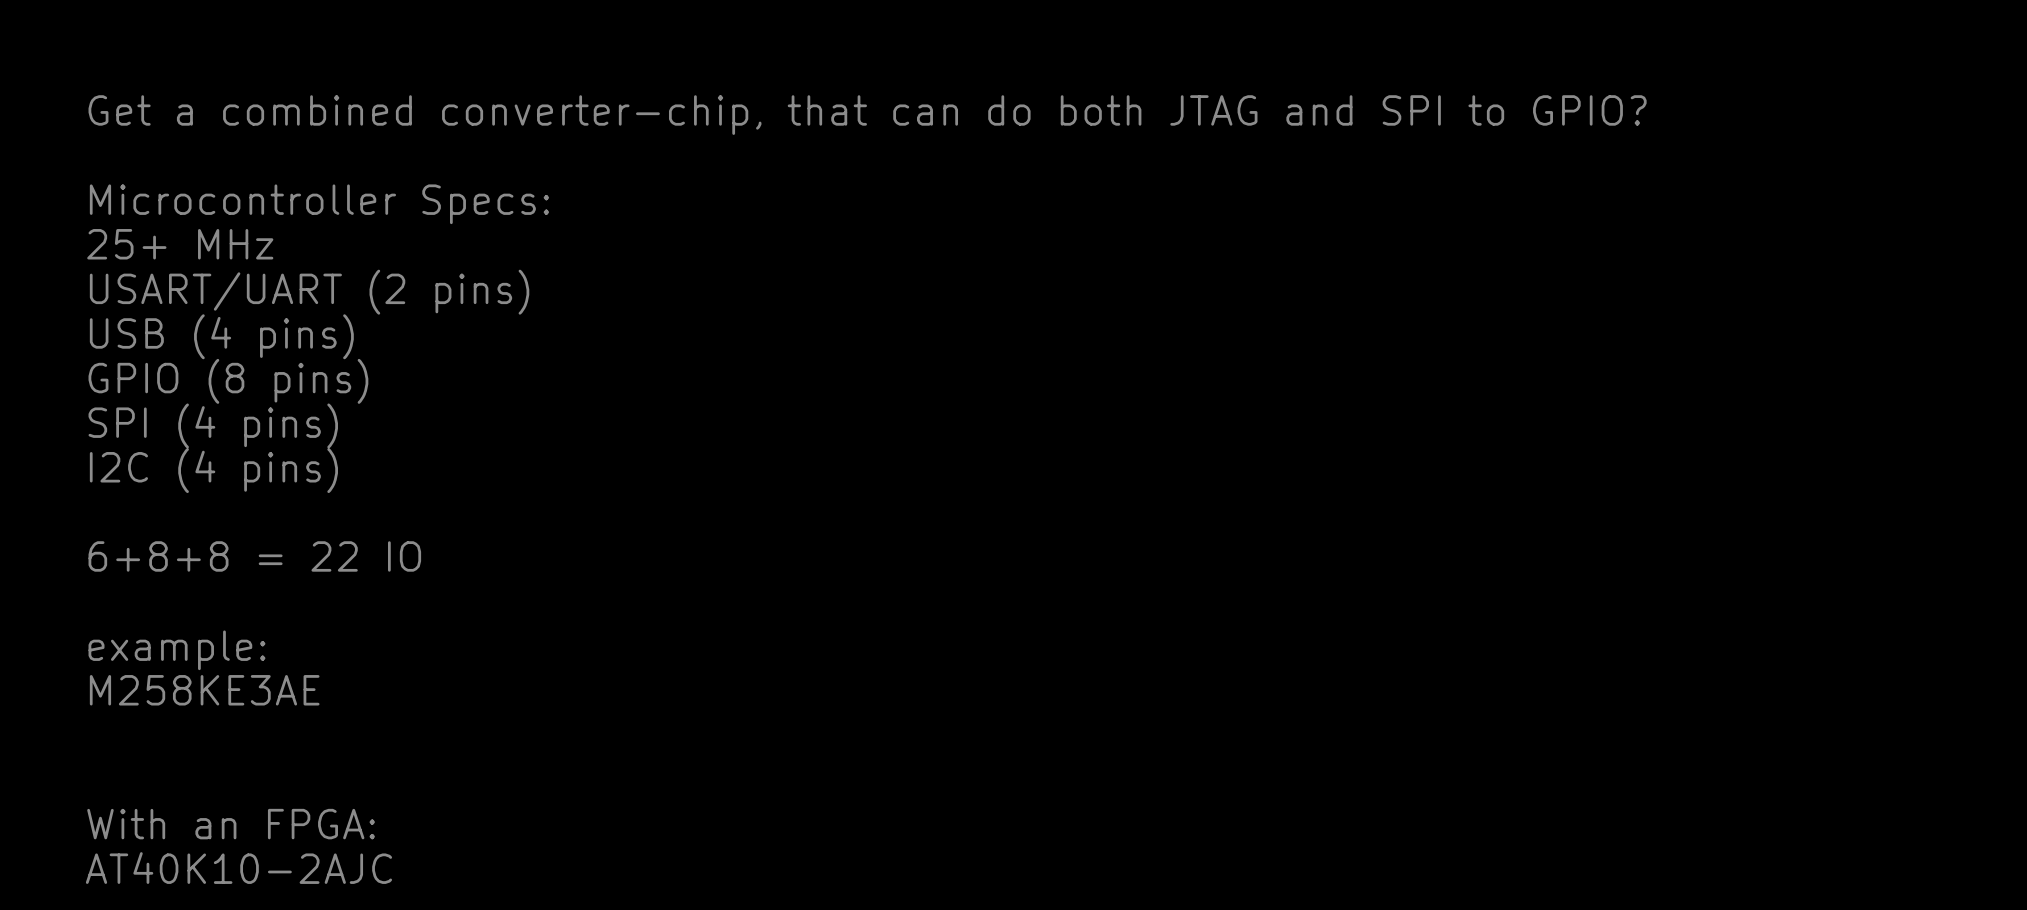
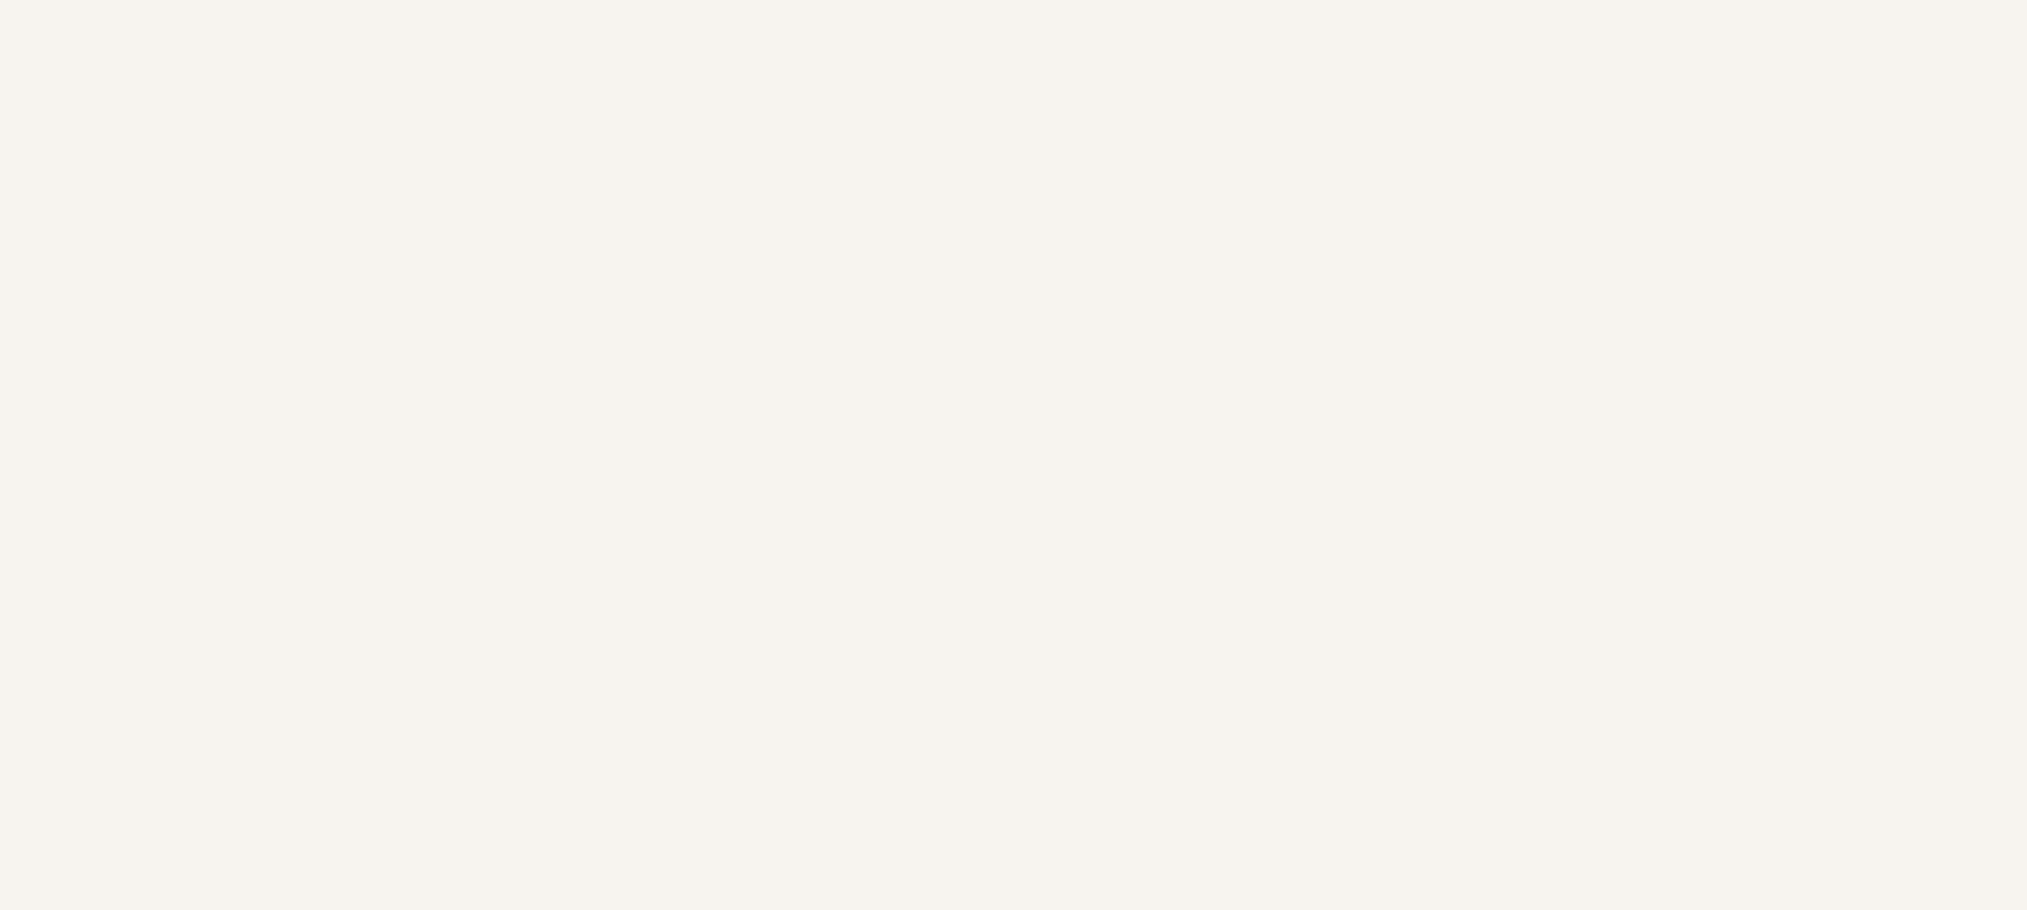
text: Get a combined converter-chip, that can do both JTAG and SPI to GPIO? (867, 115) -> none
text: Microcontroller Specs: (319, 204) -> none
text: 25+ MHz (180, 244) -> none
text: USART/UART (2 pins) (309, 292) -> none
text: USB (4 pins) (221, 336) -> none
text: GPIO (8 pins) (228, 381) -> none
text: SPI (4 pins) (213, 425) -> none
text: I2C (4 pins) (213, 470) -> none
text: 6+8+8 = 22 IO (254, 556) -> none
text: example: (176, 650) -> none
text: M258KE3AE (204, 690) -> none
text: With an FPGA: (231, 824) -> none
text: AT40K10-2AJC (238, 868) -> none

